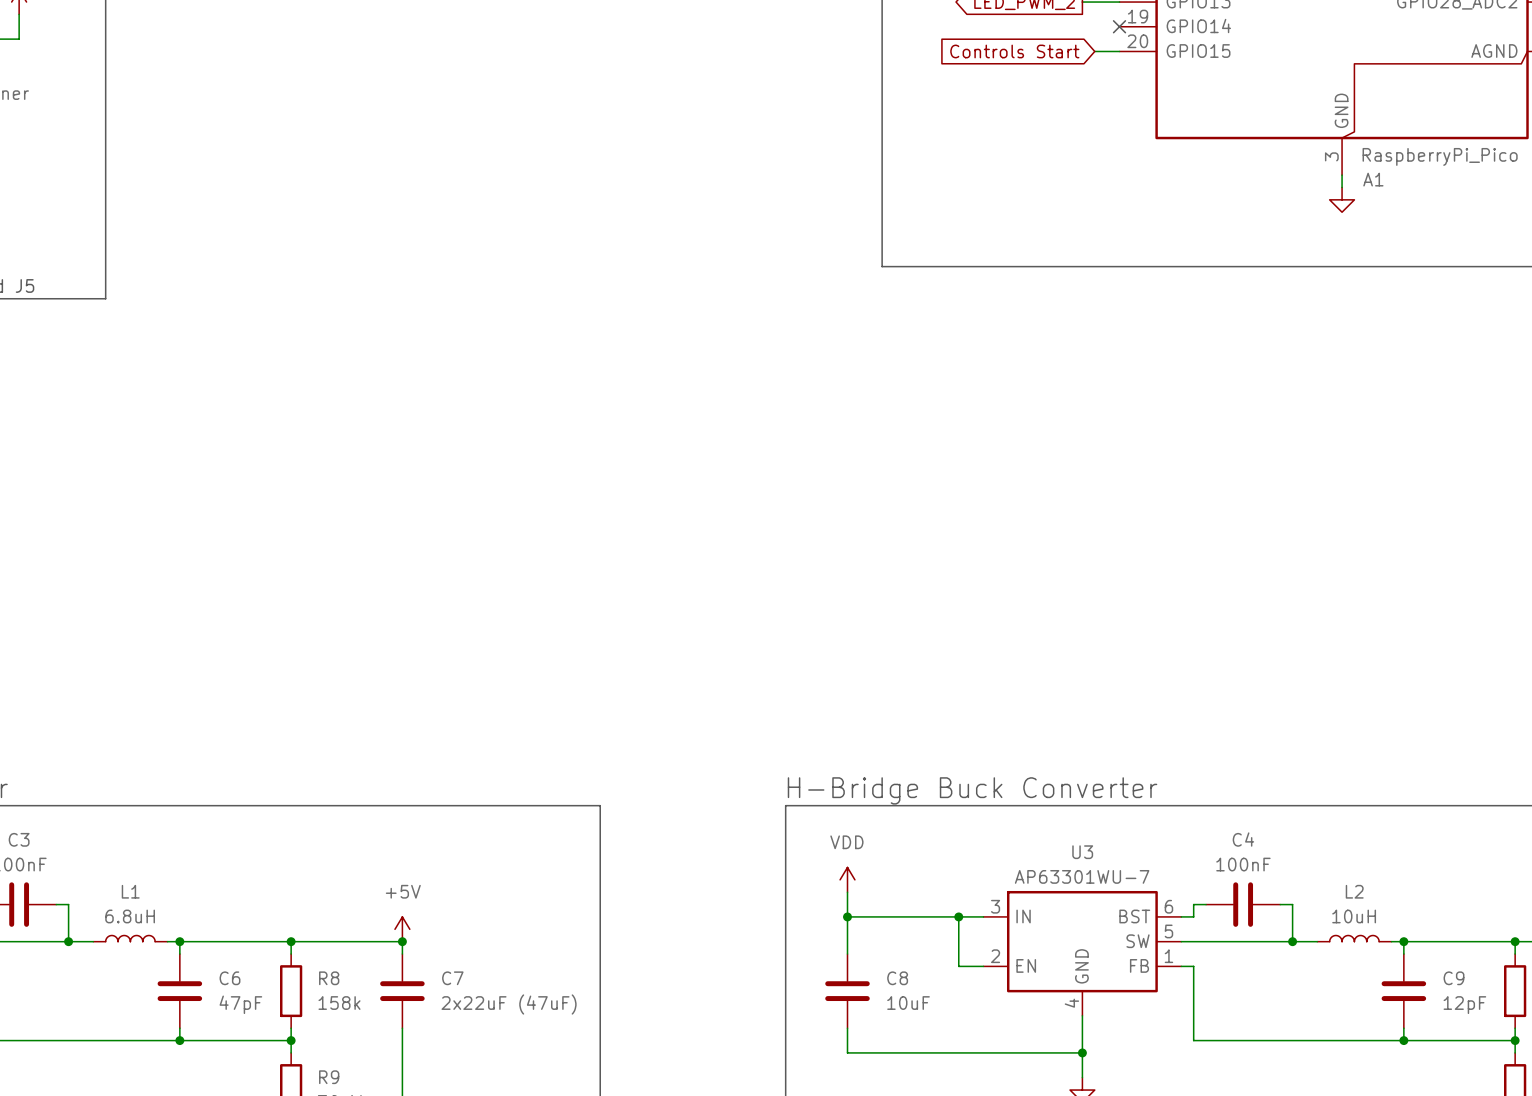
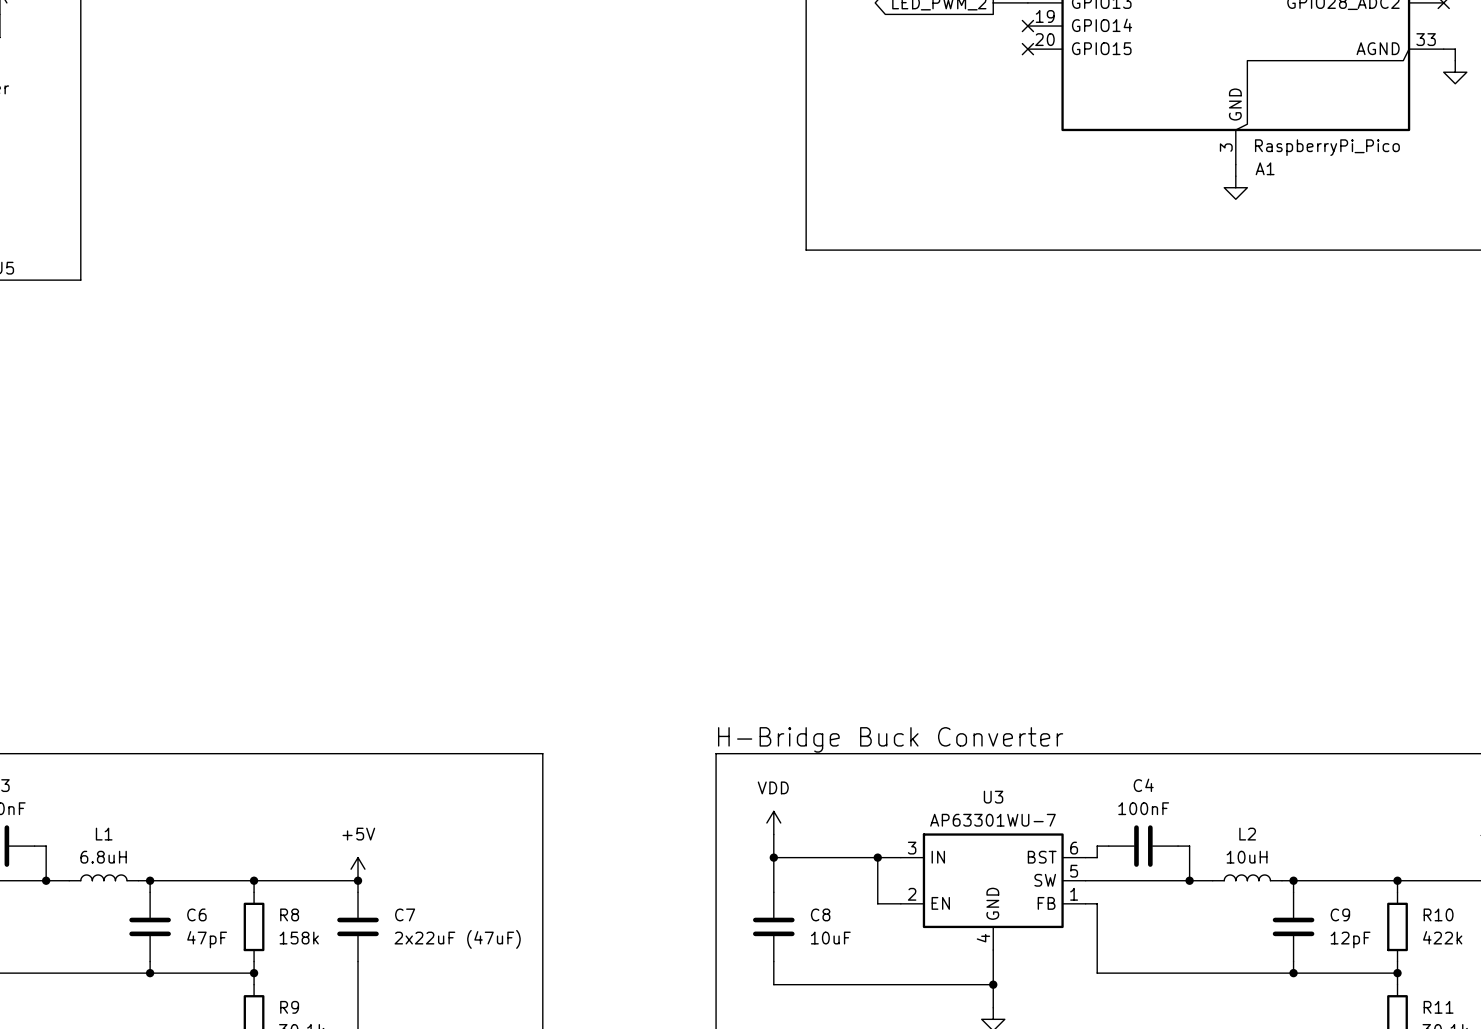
global label: Controls Start (1014, 51) -> none
wire: (1094, 51) (1119, 51) -> none
no-connect mark: none -> (1027, 49)

